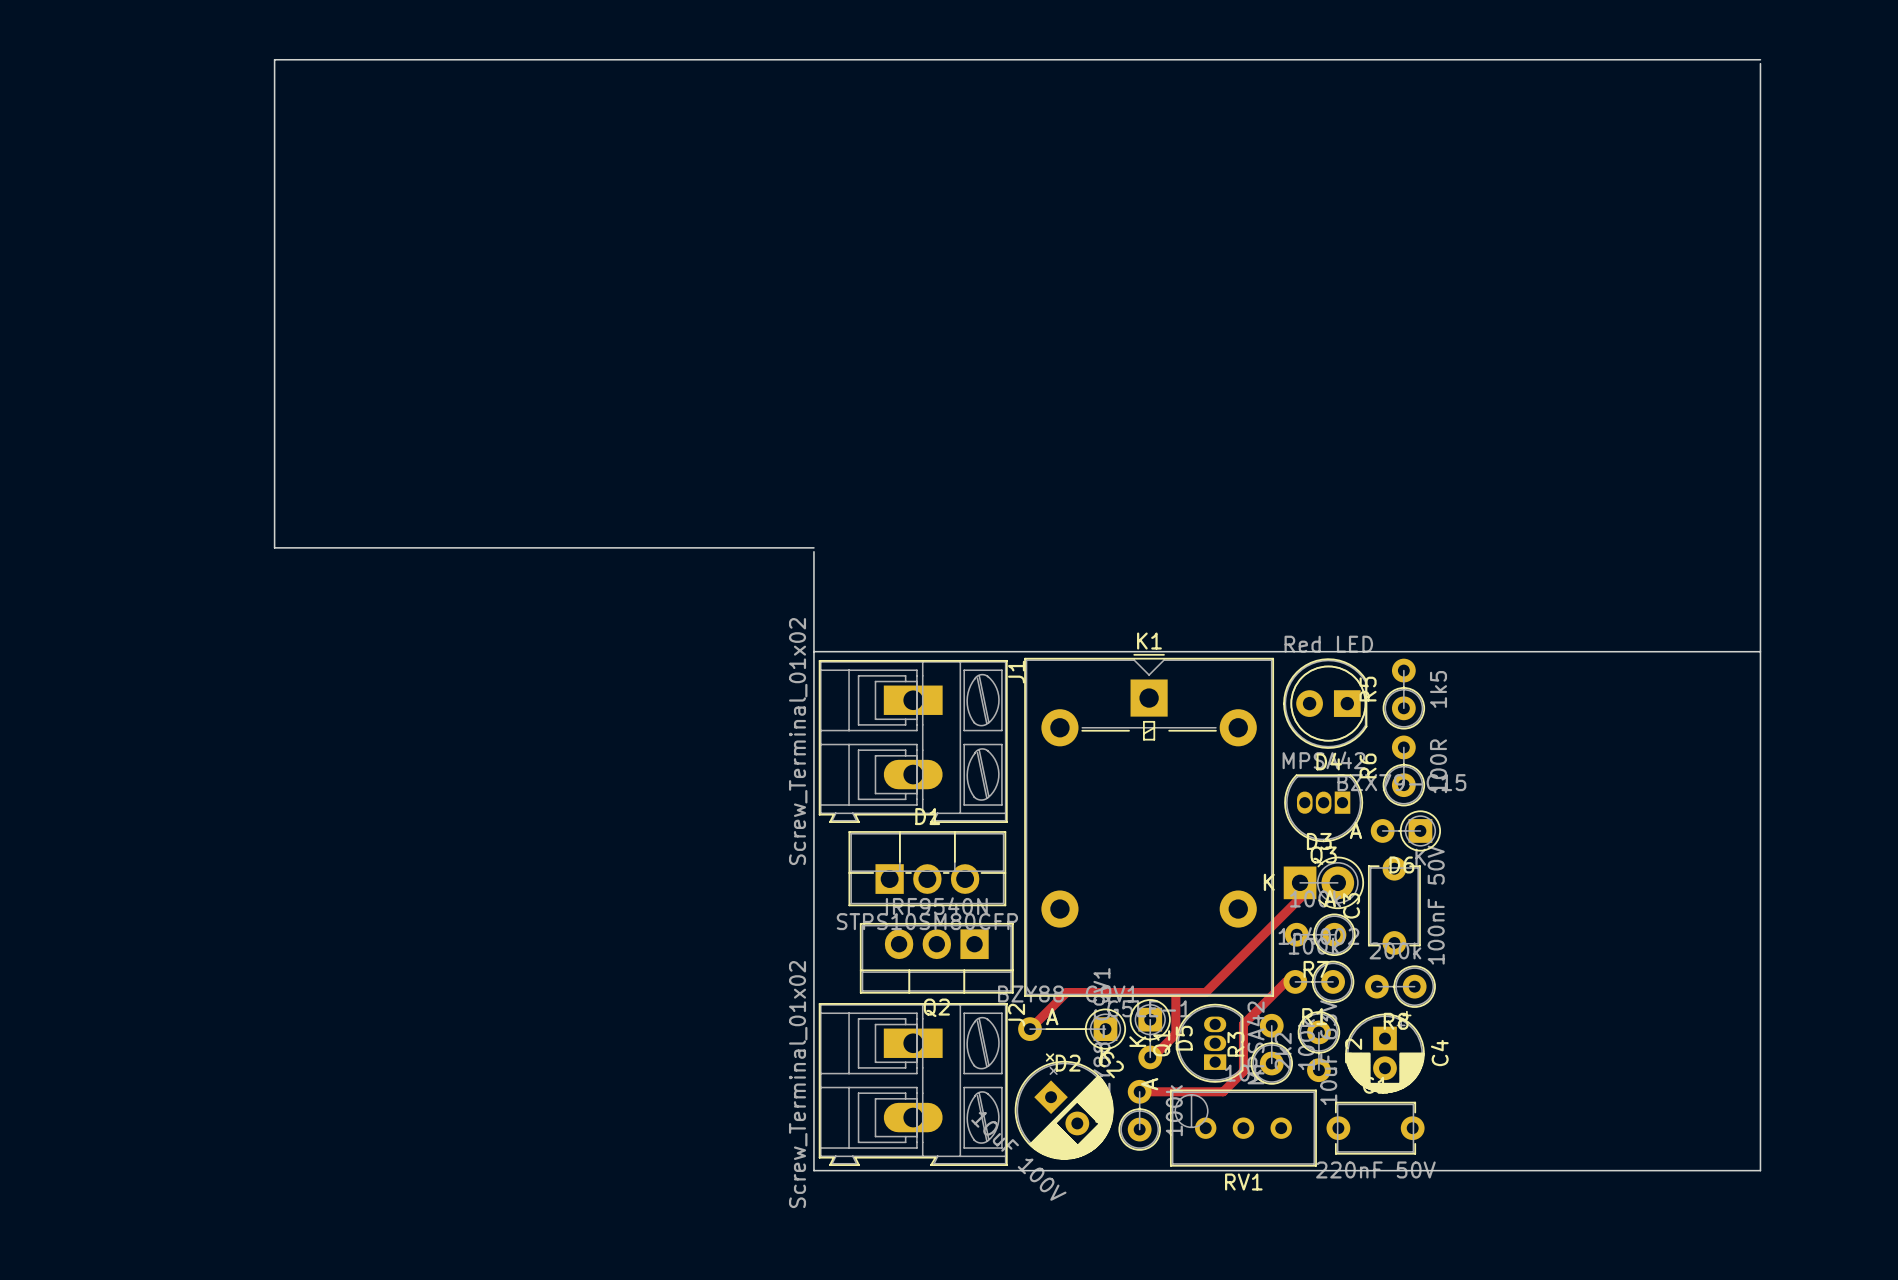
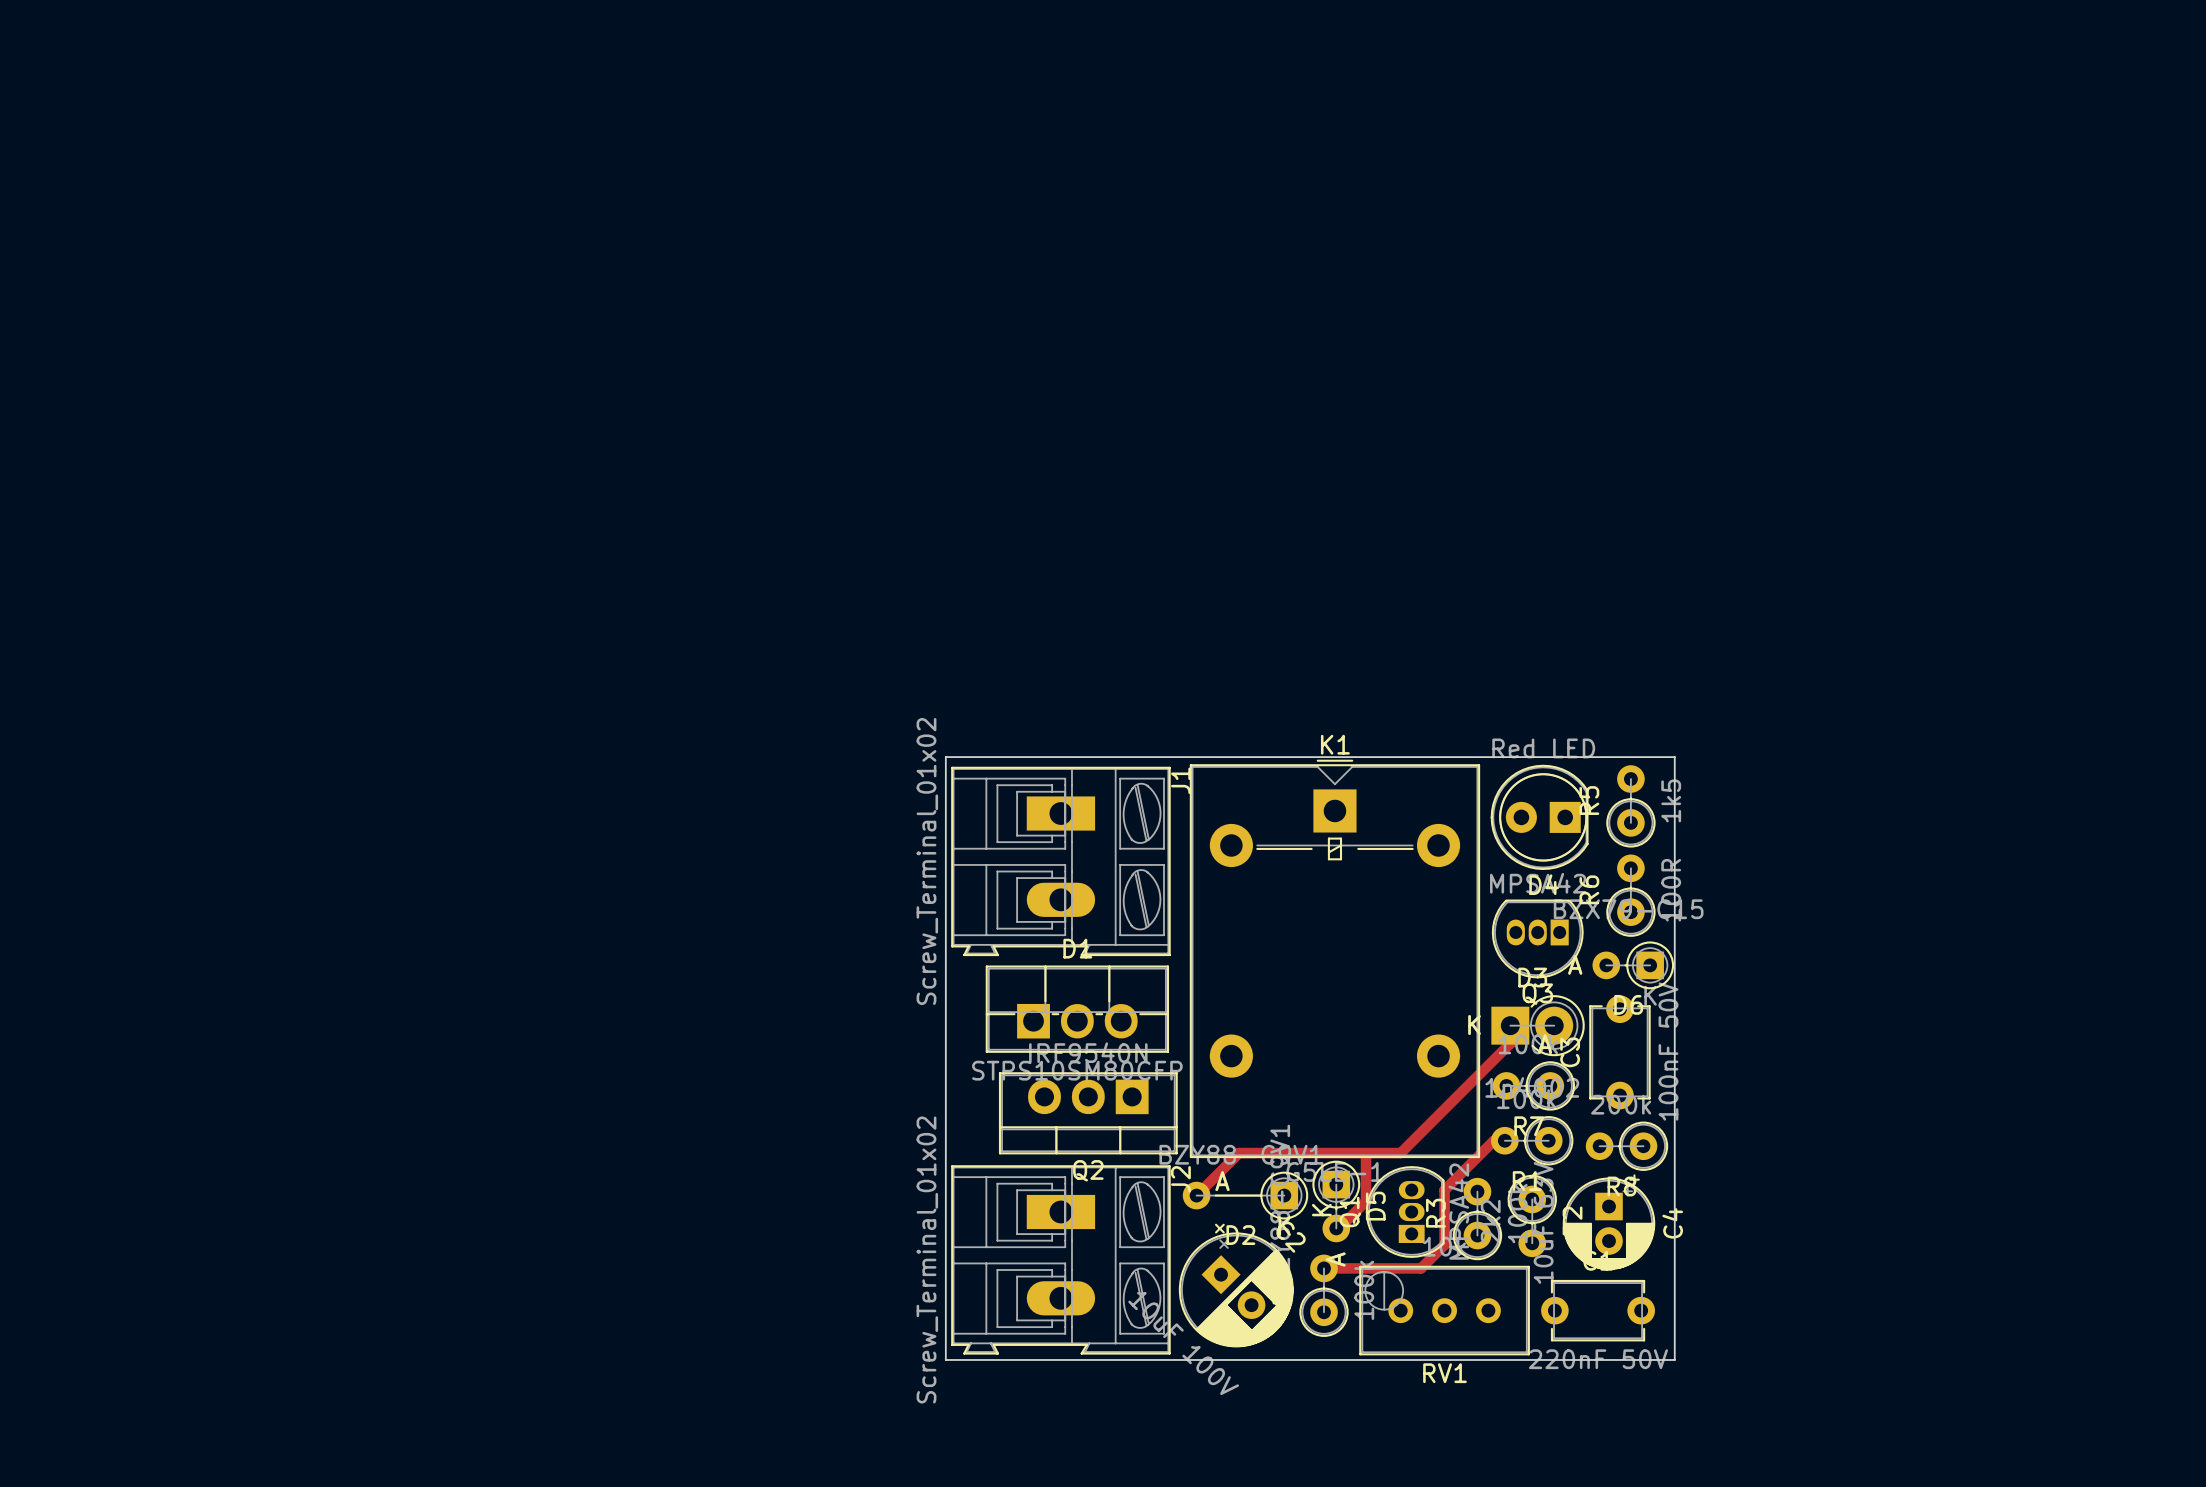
board edge: (1760, 59) (274, 59) (274, 547) (813, 547) -> none
board edge: (1760, 63) (1760, 1170) (1441, 1170) -> none
board edge: (813, 551) (813, 1170) -> (945, 757) (945, 1359)
board edge: (1441, 651) (1760, 651) -> (1674, 757) (1674, 1359)

